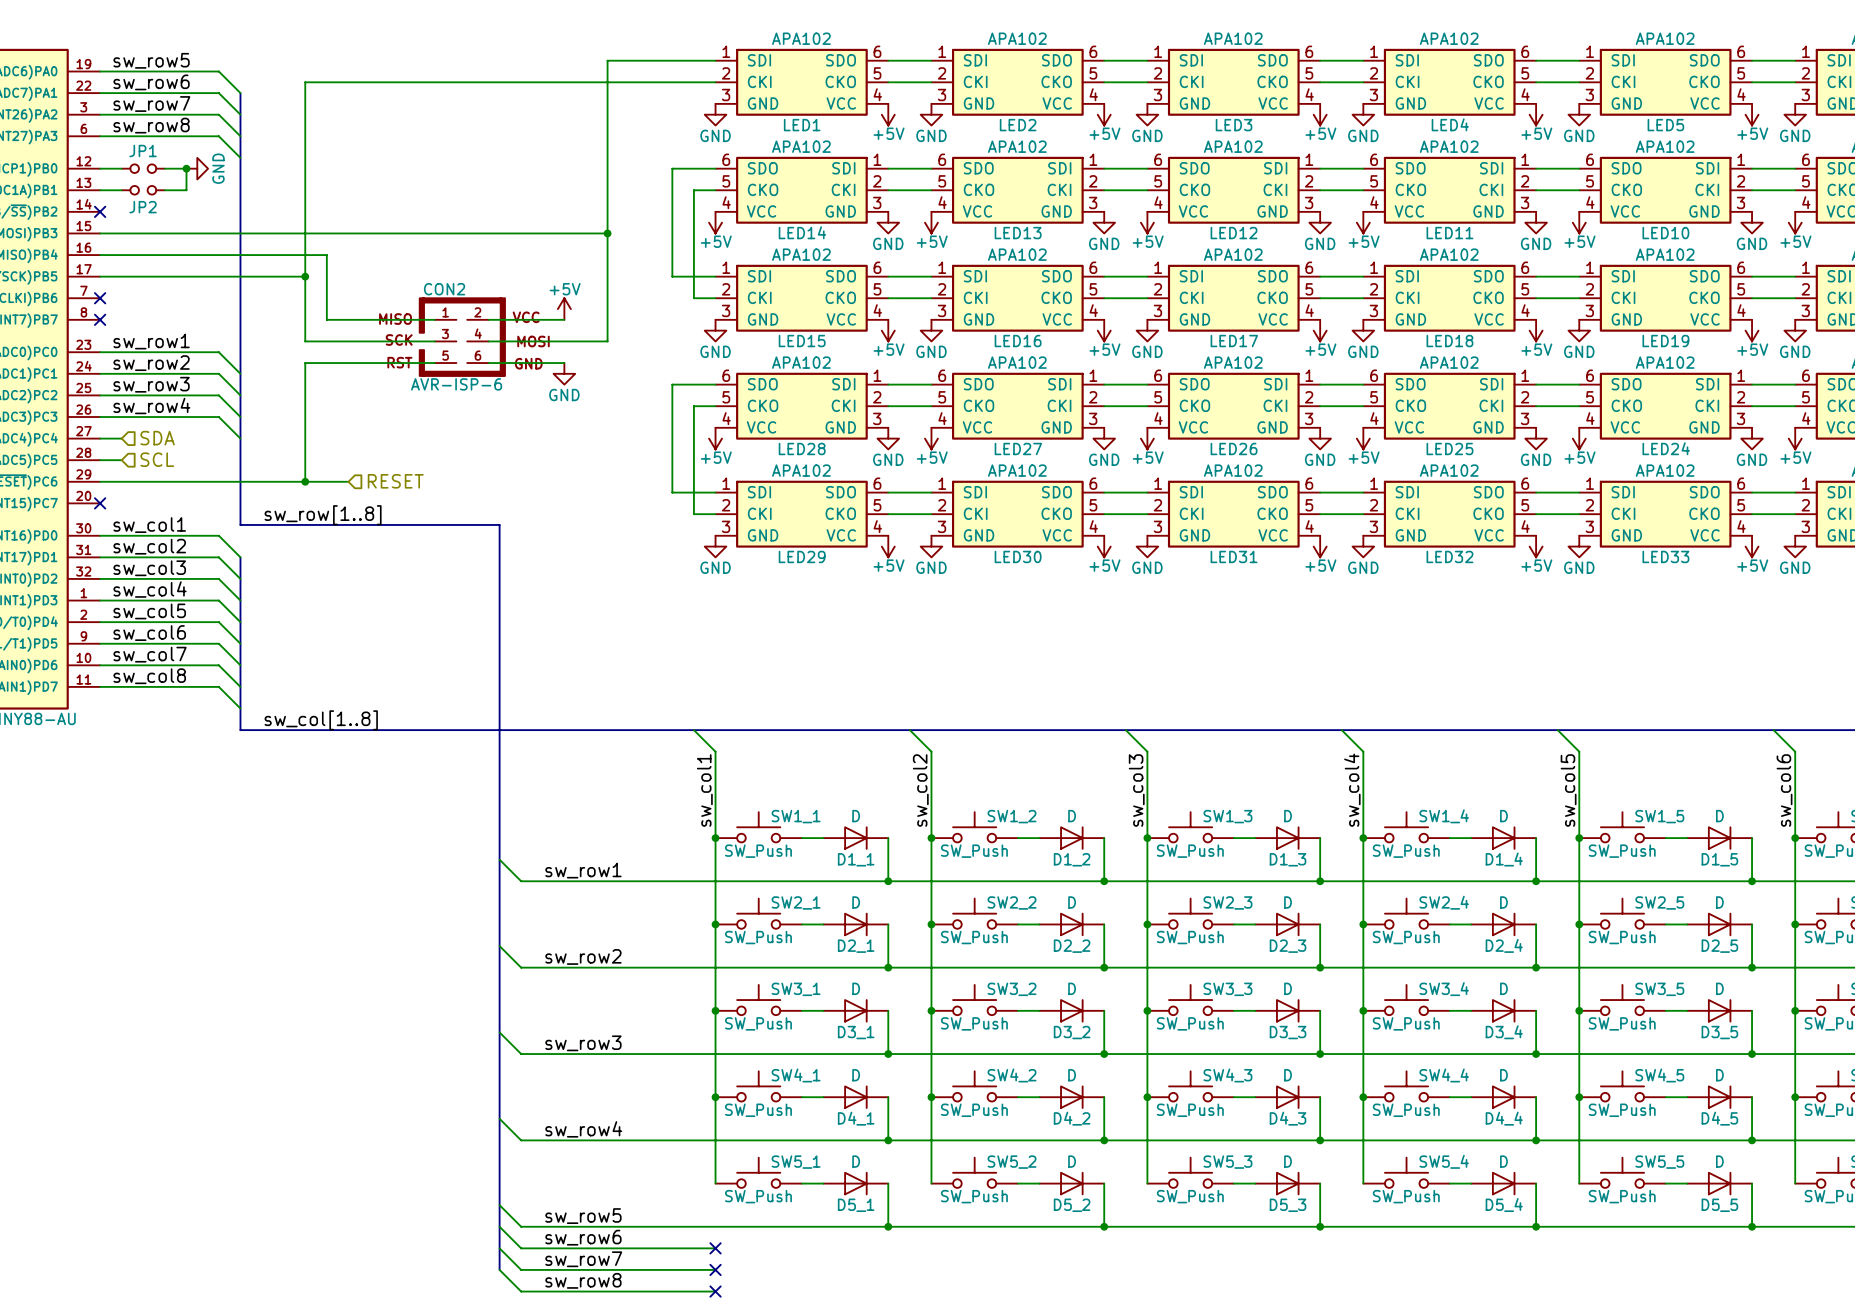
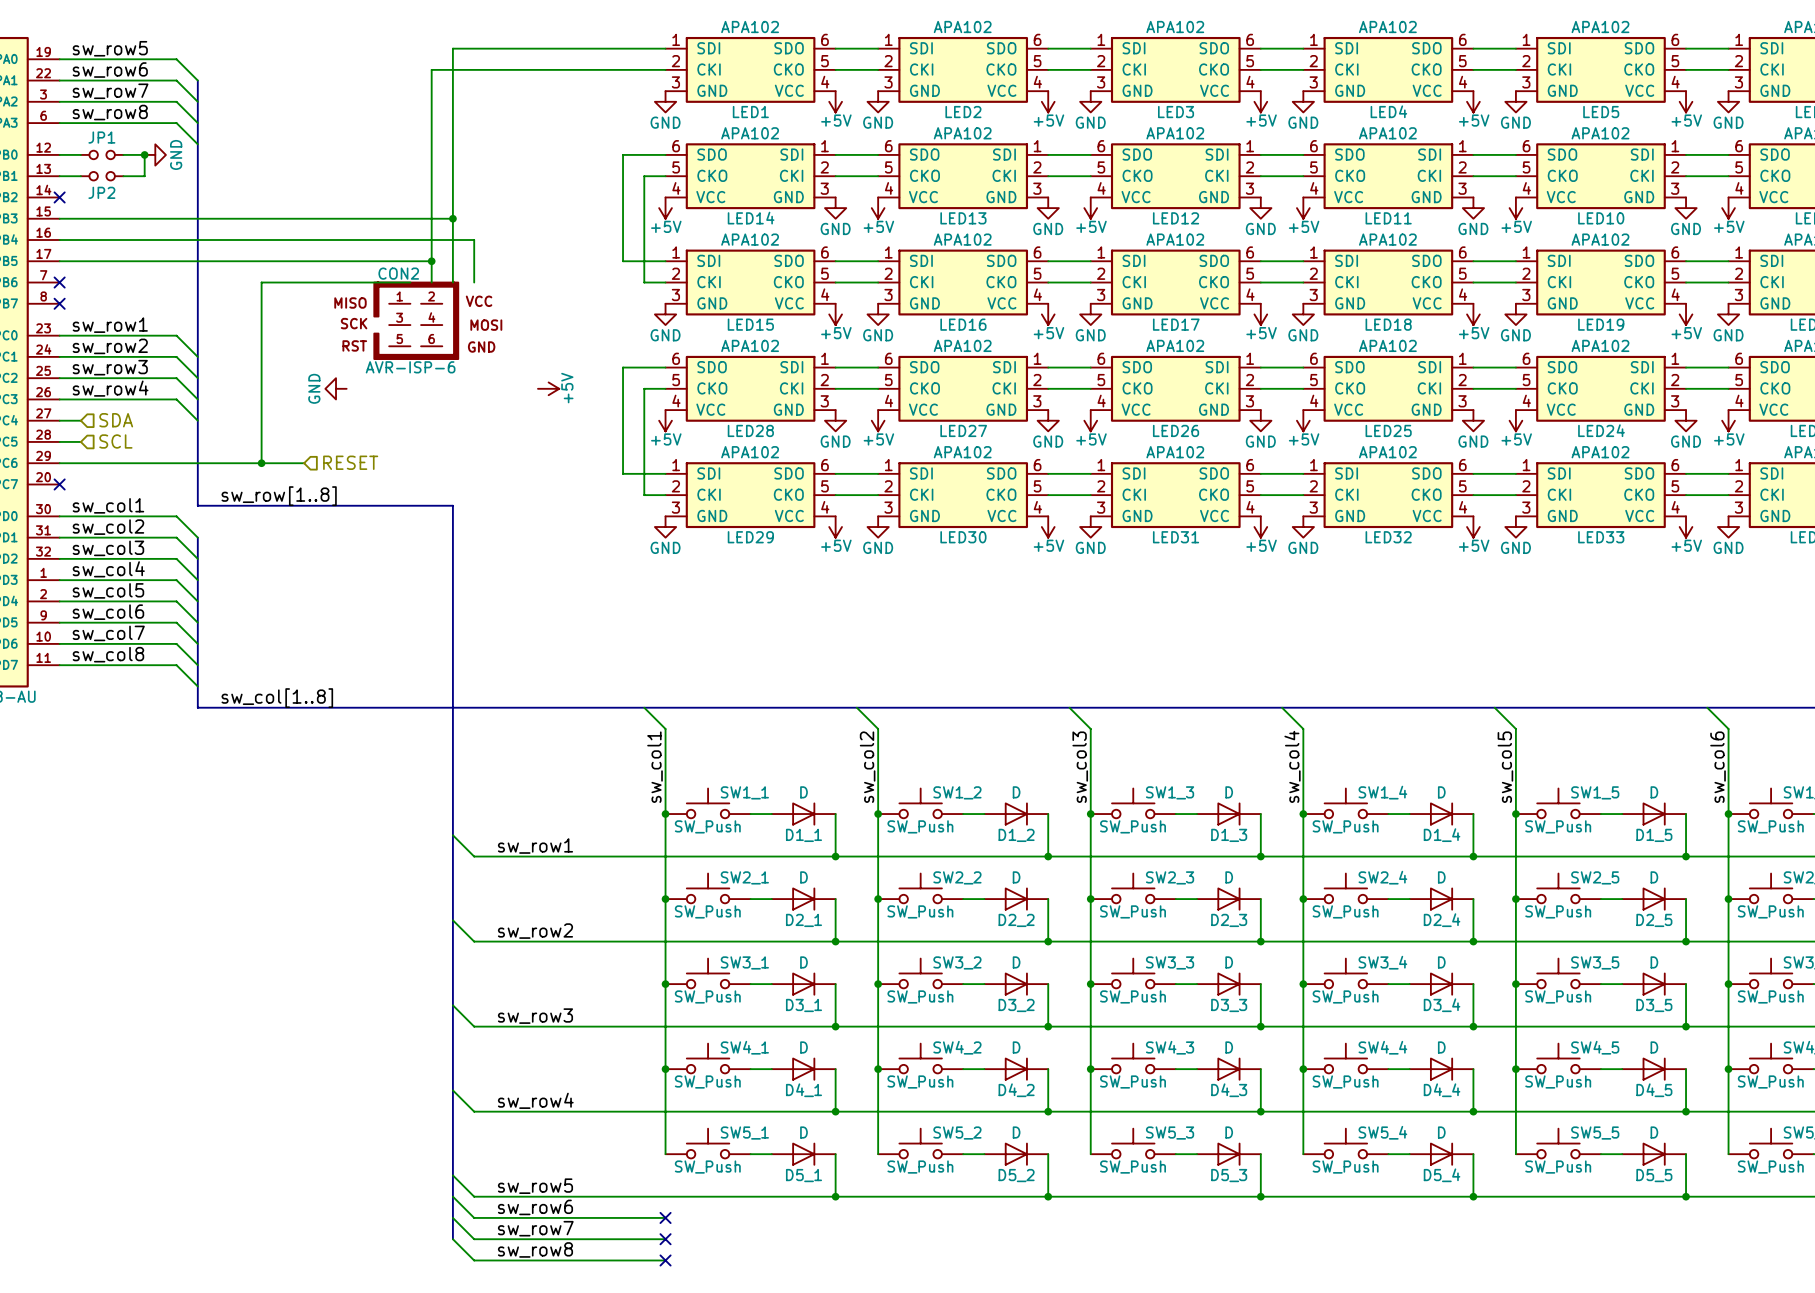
wire: (607, 60) (607, 341) (488, 341) -> (559, 48) (452, 48) (452, 282)
wire: (478, 82) (305, 82) (305, 298) -> (431, 69) (431, 282)
wire: (499, 233) (607, 233) -> none
junction: none -> (452, 218)
junction: (607, 233) -> none
wire: (326, 255) (326, 319) (434, 319) -> (282, 240) (474, 240) (474, 282)
wire: none -> (261, 261) (431, 261)
junction: (305, 276) -> none
junction: none -> (431, 261)
wire: none -> (261, 282) (410, 282)
power symbol rotation: 0° (564, 309) -> 90° clockwise (548, 388)
power symbol position: +5V (564, 309) -> +5V (548, 388)
wire: (488, 319) (564, 319) -> none
wire: (305, 341) (434, 341) -> (261, 325) (261, 346)
wire: (305, 363) (434, 363) -> none
wire: (488, 363) (564, 363) -> none
power symbol rotation: 0° (564, 373) -> 90° clockwise (336, 388)
power symbol position: GND (564, 373) -> GND (336, 388)

